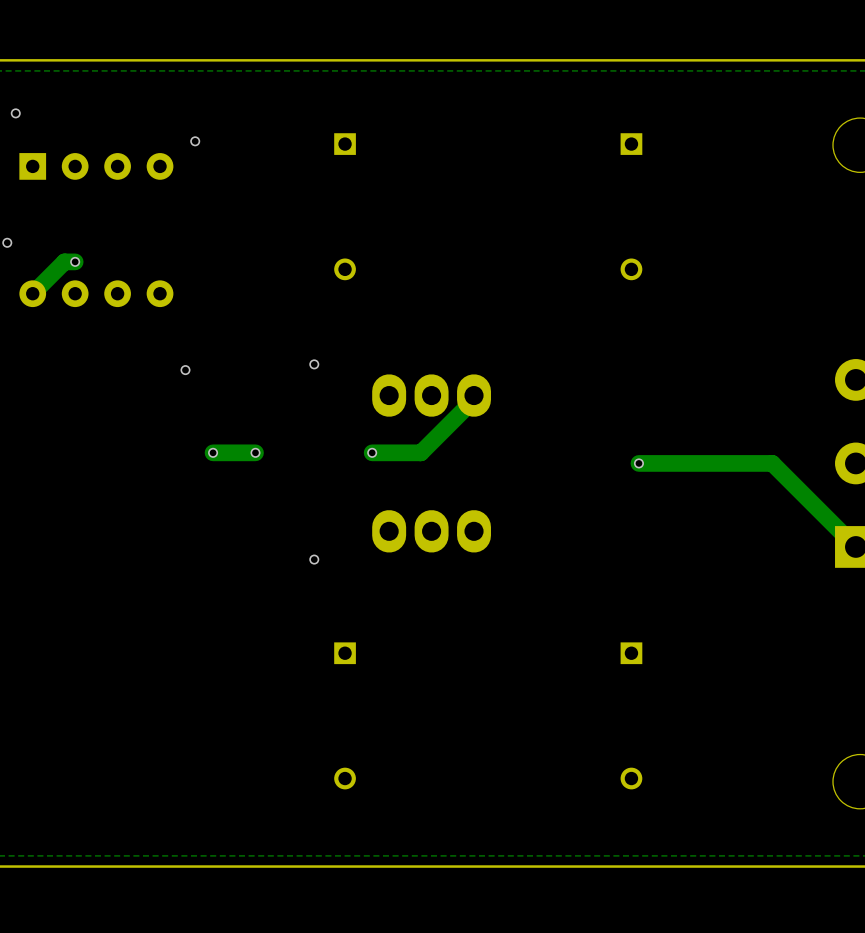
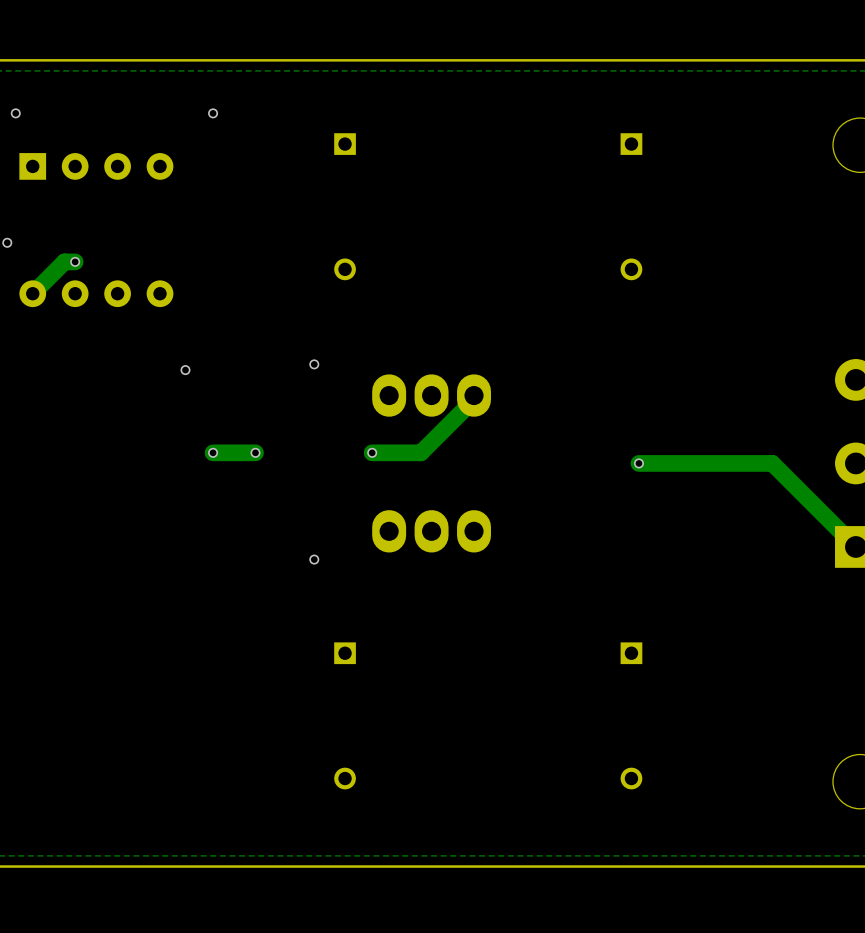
via position: (195, 141) -> (213, 113)

